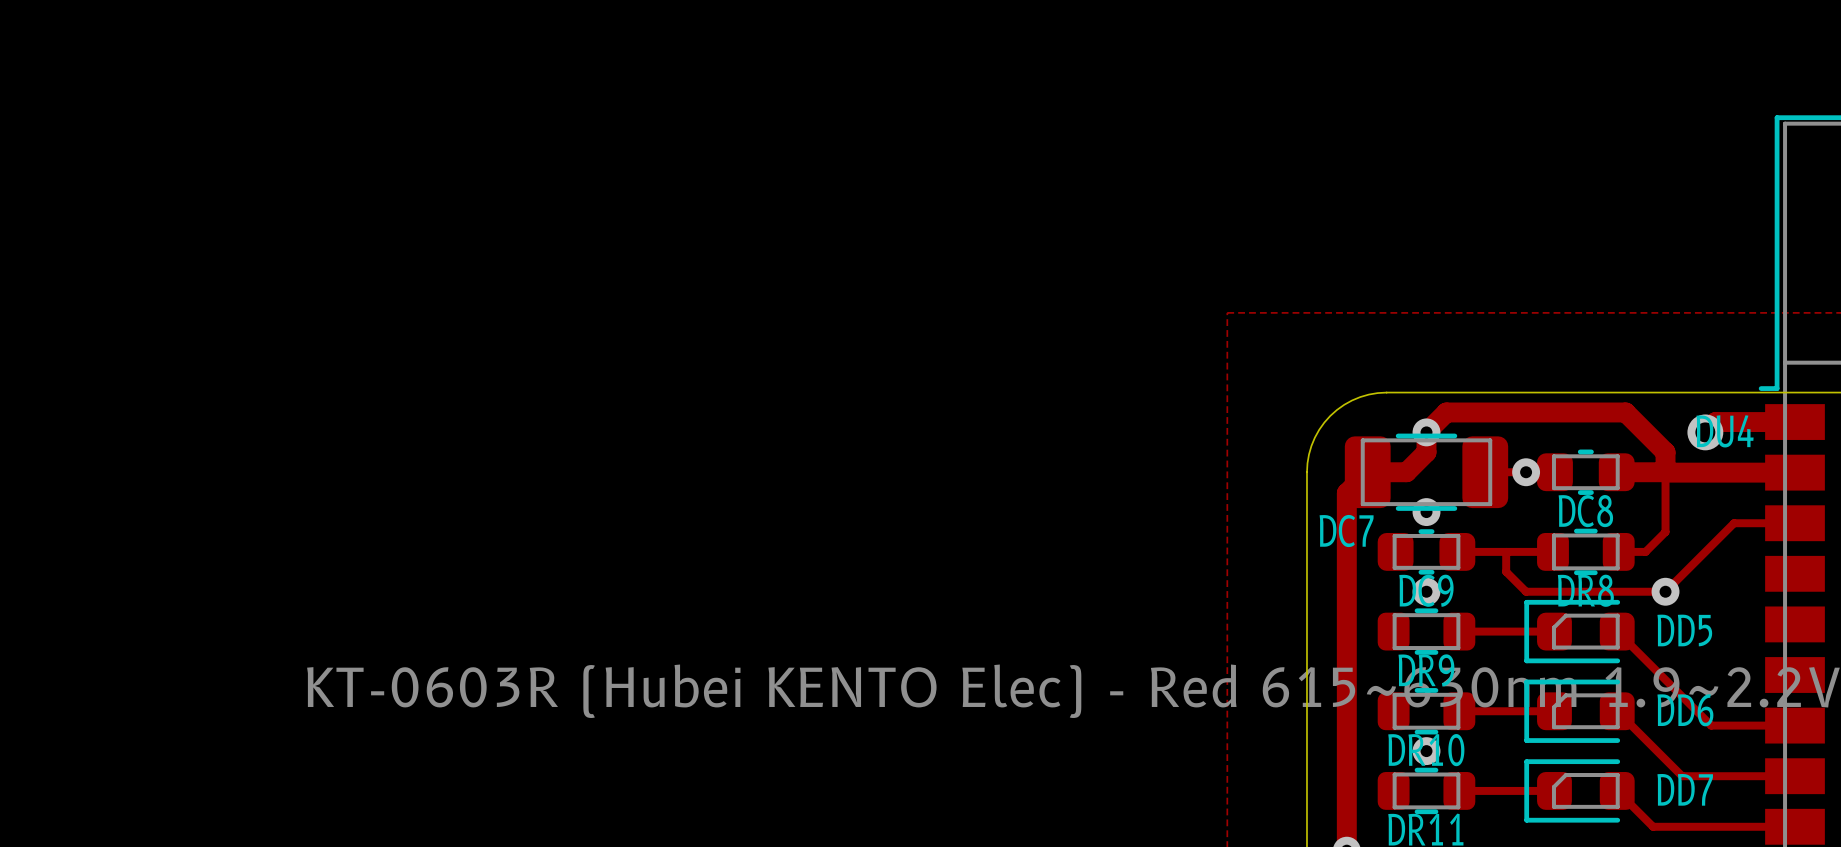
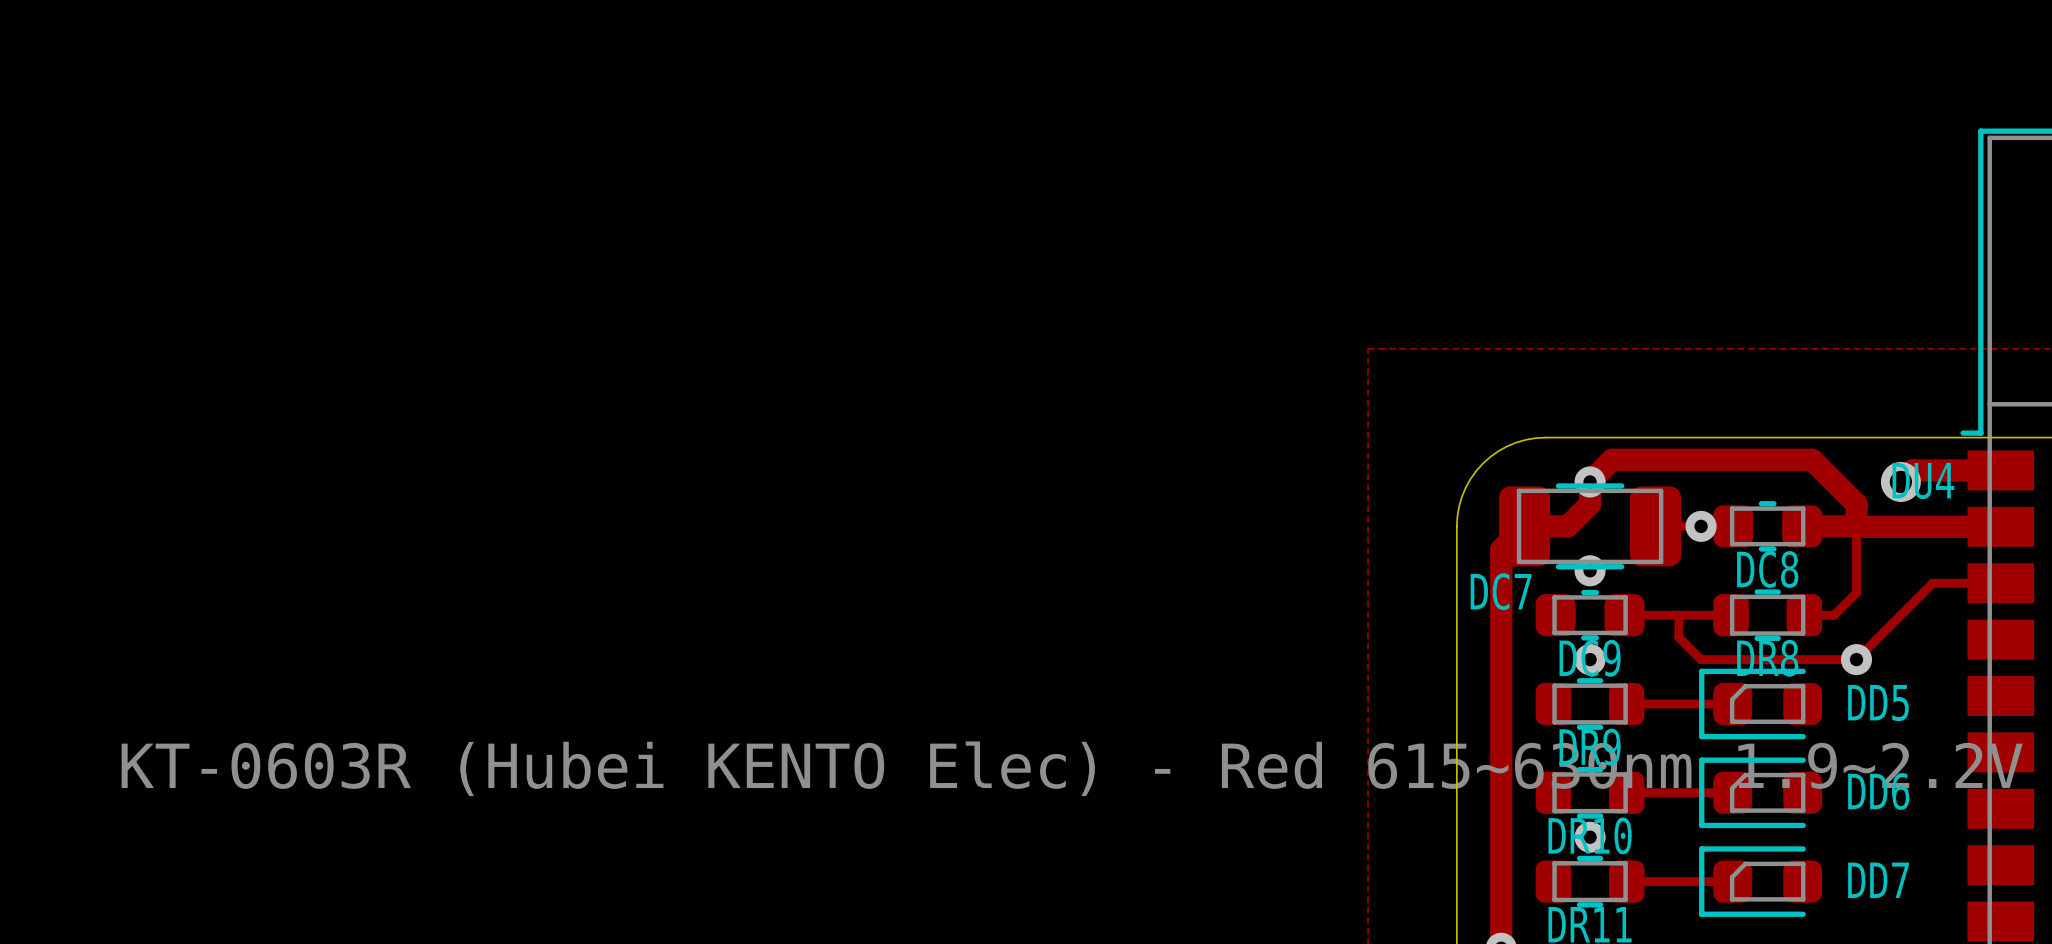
track: (1617, 631) (1711, 725) (1795, 725) -> none
track: (1617, 711) (1682, 776) (1795, 776) -> none
track: (1617, 790) (1653, 826) (1795, 826) -> none

